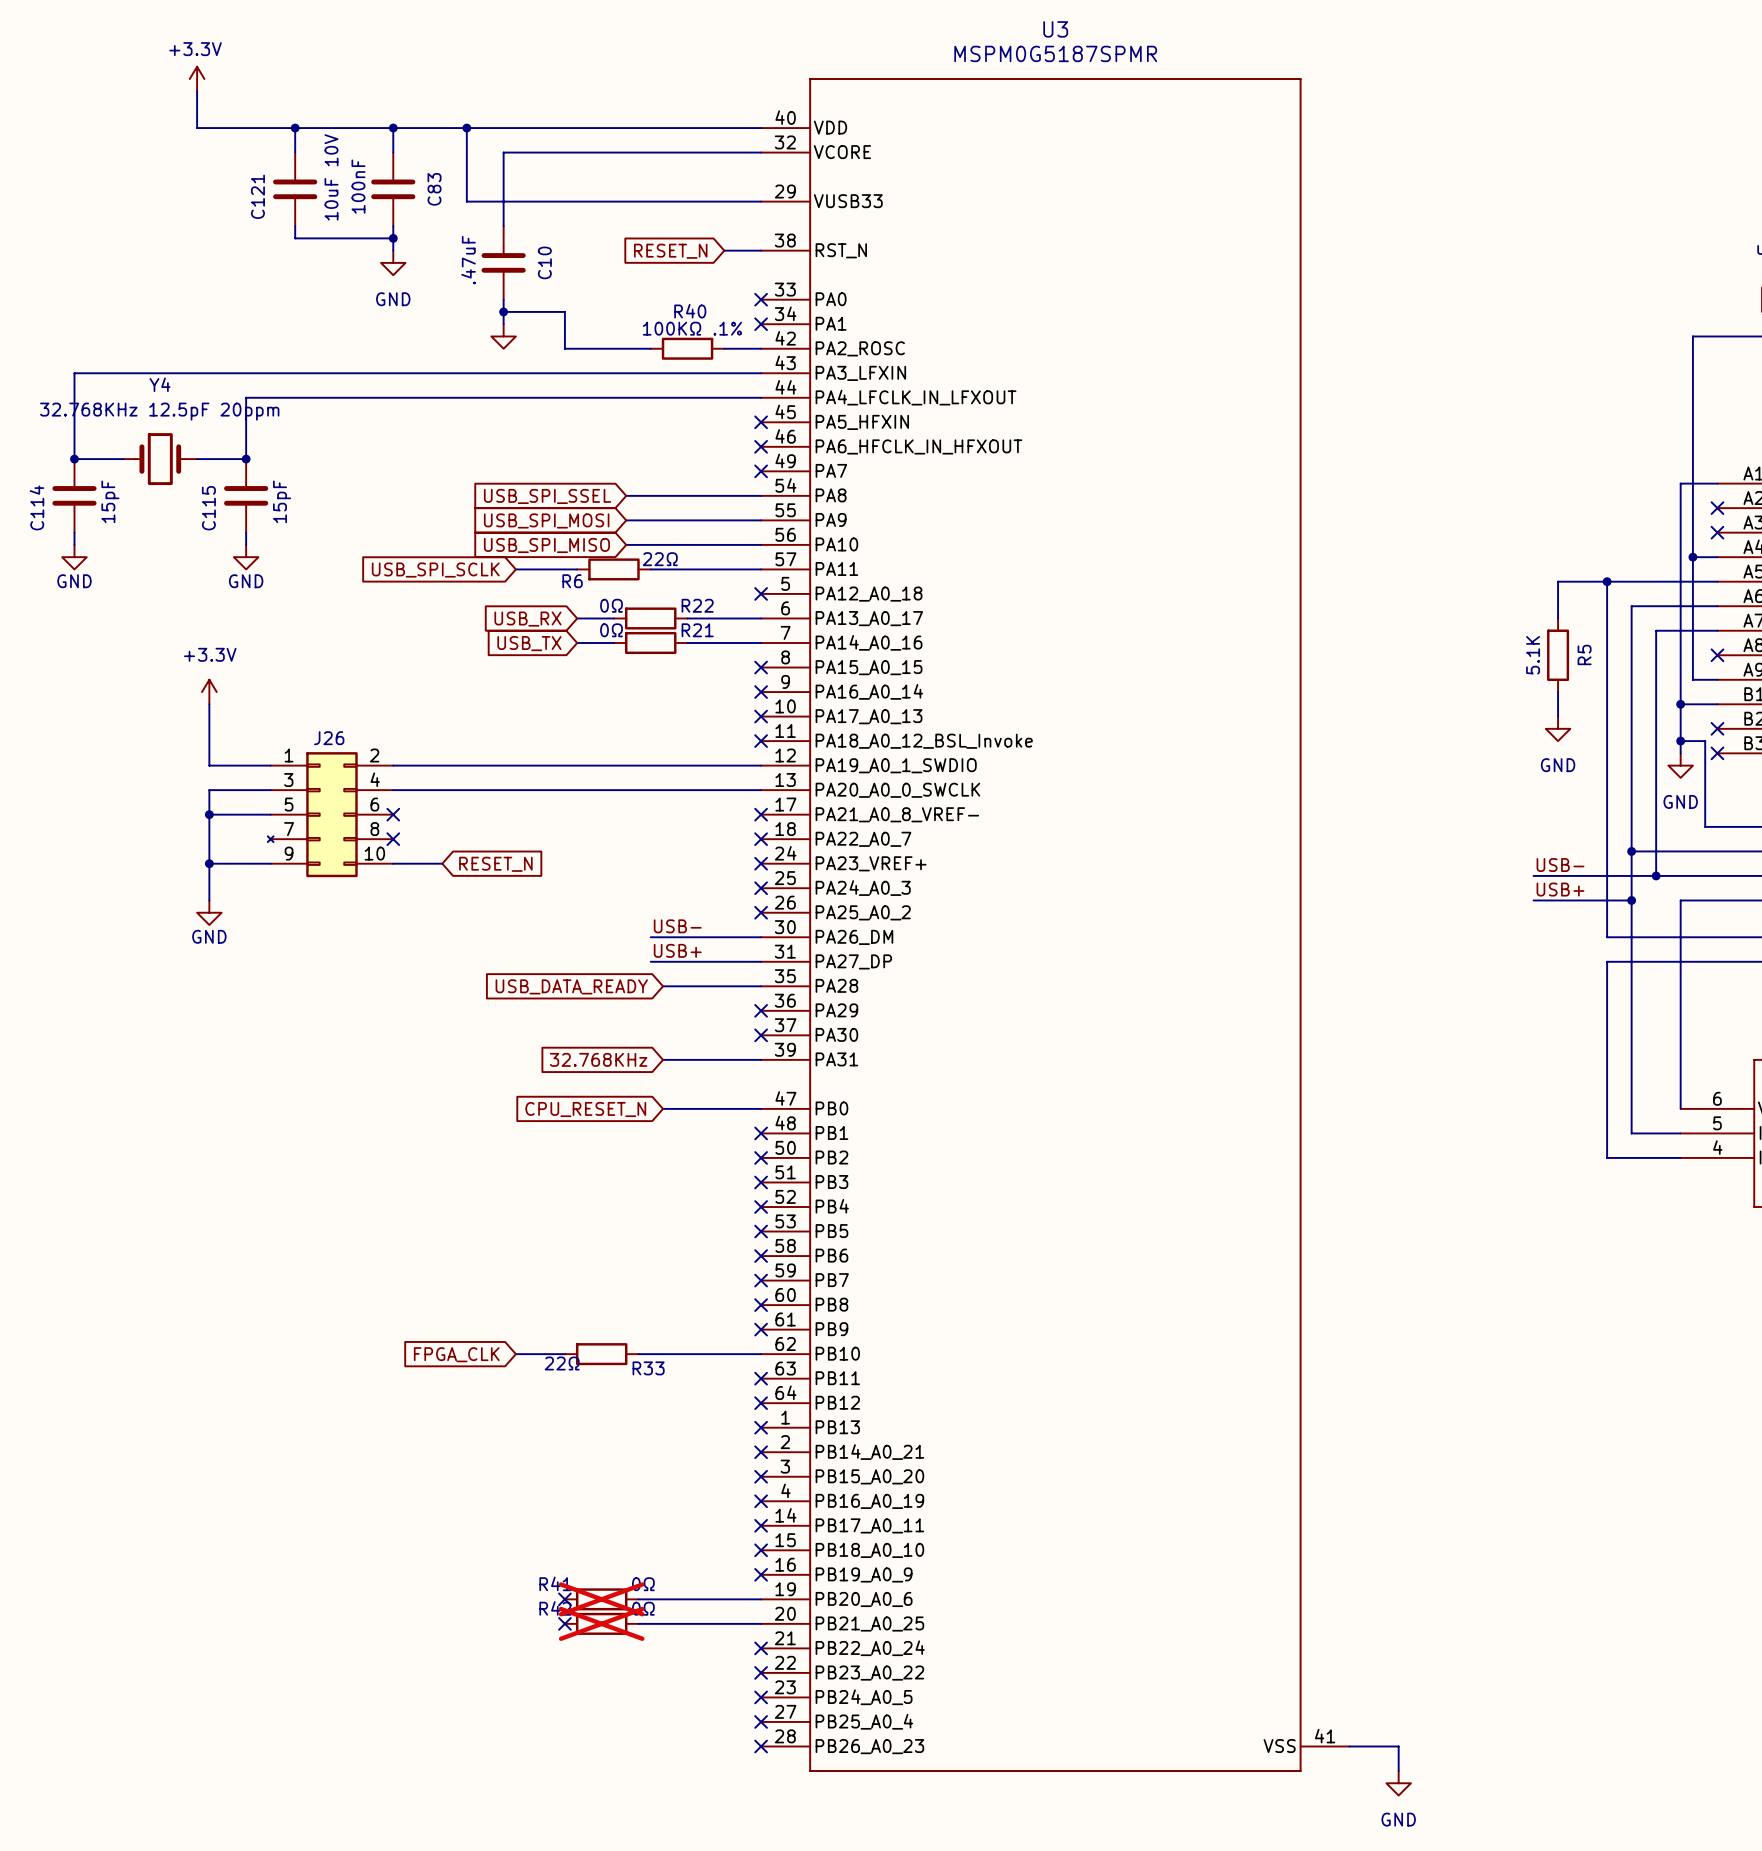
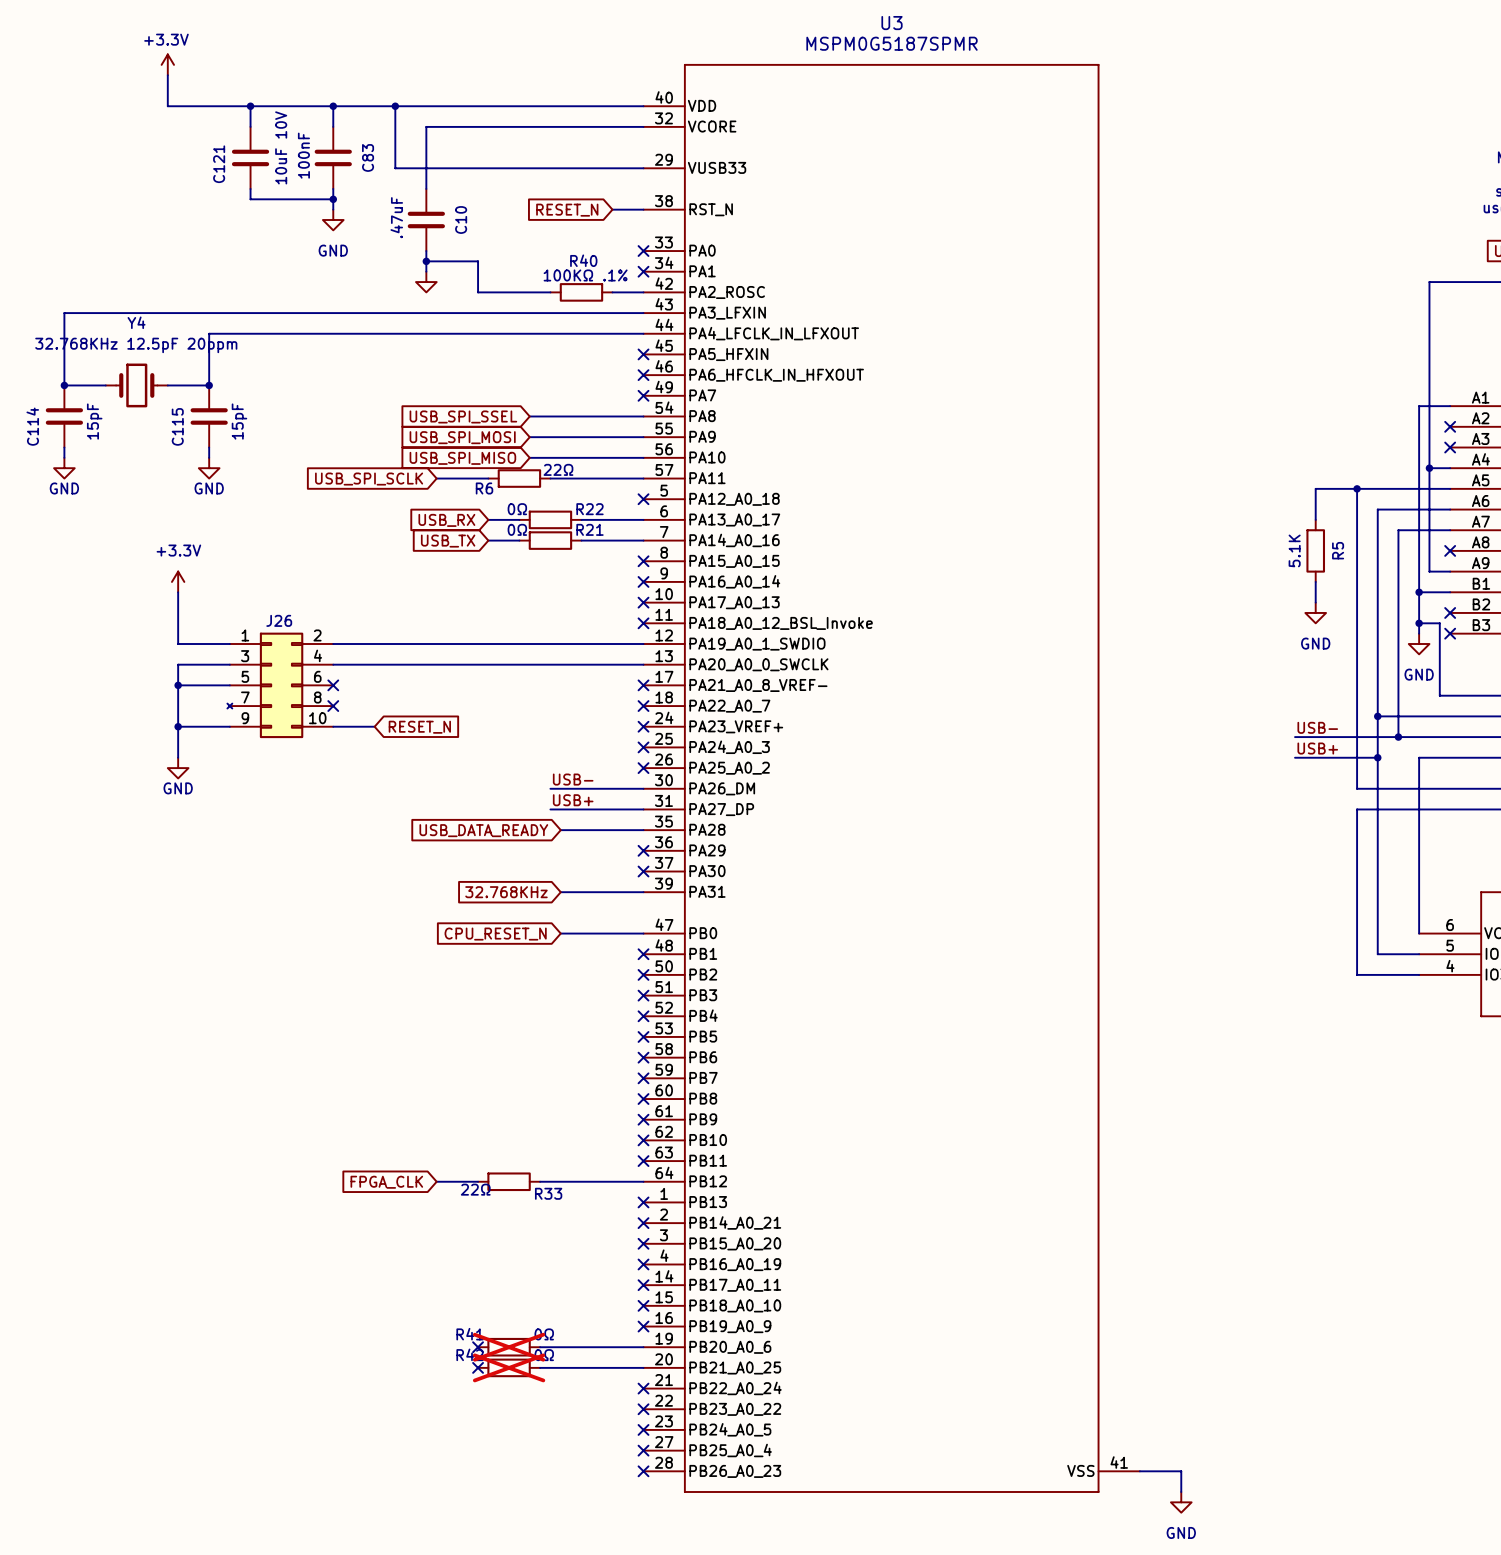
global label position: FPGA_CLK (456, 1354) -> FPGA_CLK (386, 1182)
wire: (515, 1354) (564, 1354) -> (436, 1181) (478, 1181)
R33 position: (601, 1354) -> (509, 1181)
wire: (638, 1354) (761, 1354) -> (540, 1181) (643, 1181)
no-connect mark position: (761, 1403) -> (643, 1140)

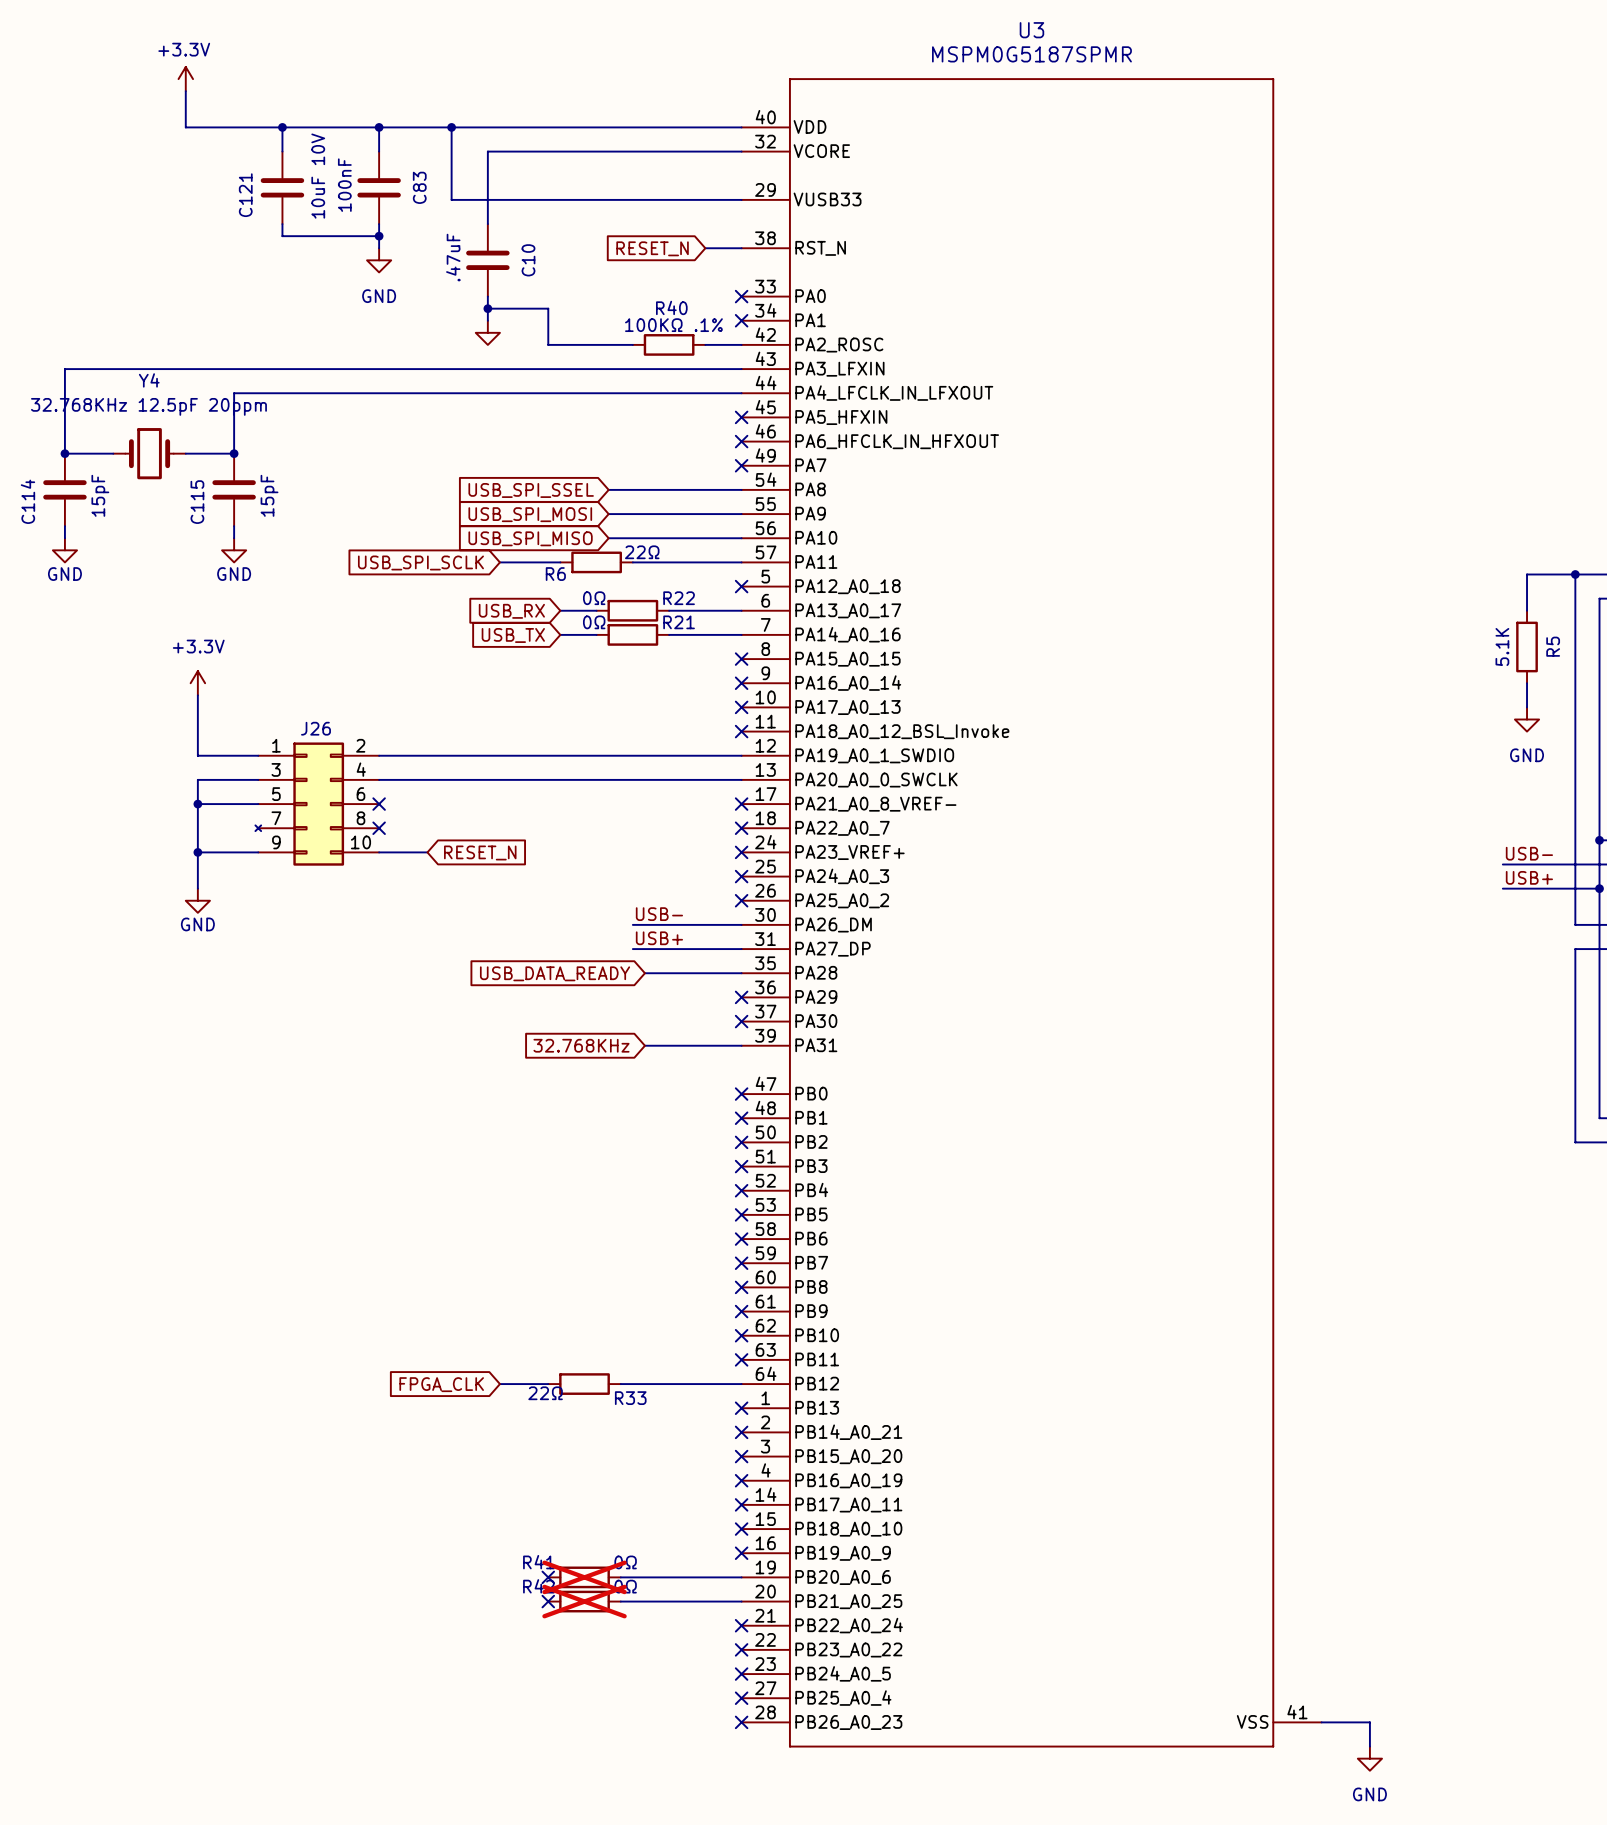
wire: (560, 933) (643, 933) -> none
no-connect mark: none -> (741, 1094)
global label: CPU_RESET_N (495, 934) -> none

